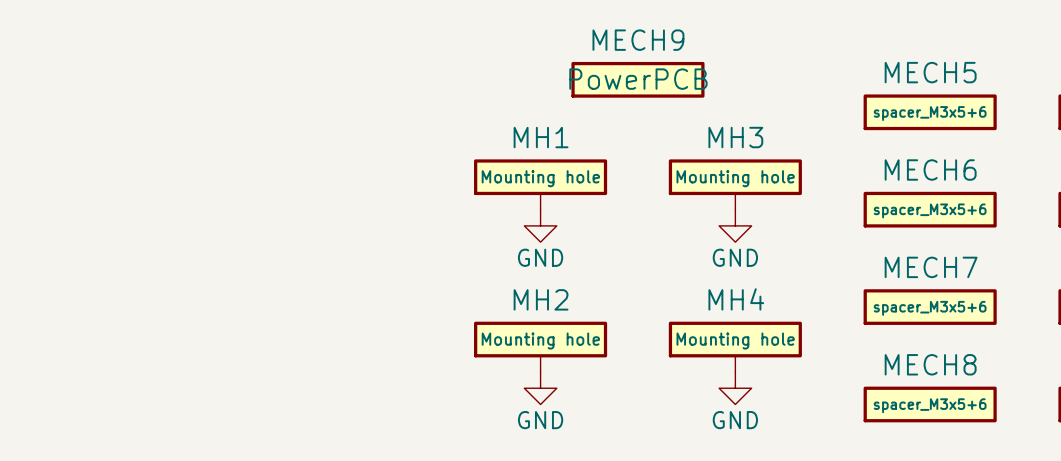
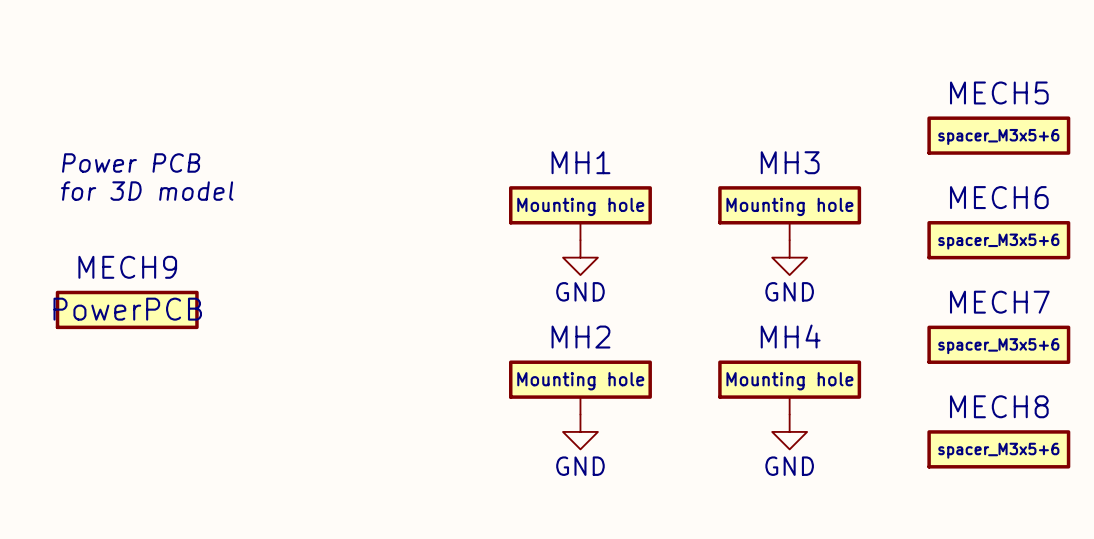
MECH9 position: (637, 79) -> (127, 309)
text: none -> Power PCB (131, 162)
text: none -> for 3D model (147, 191)

